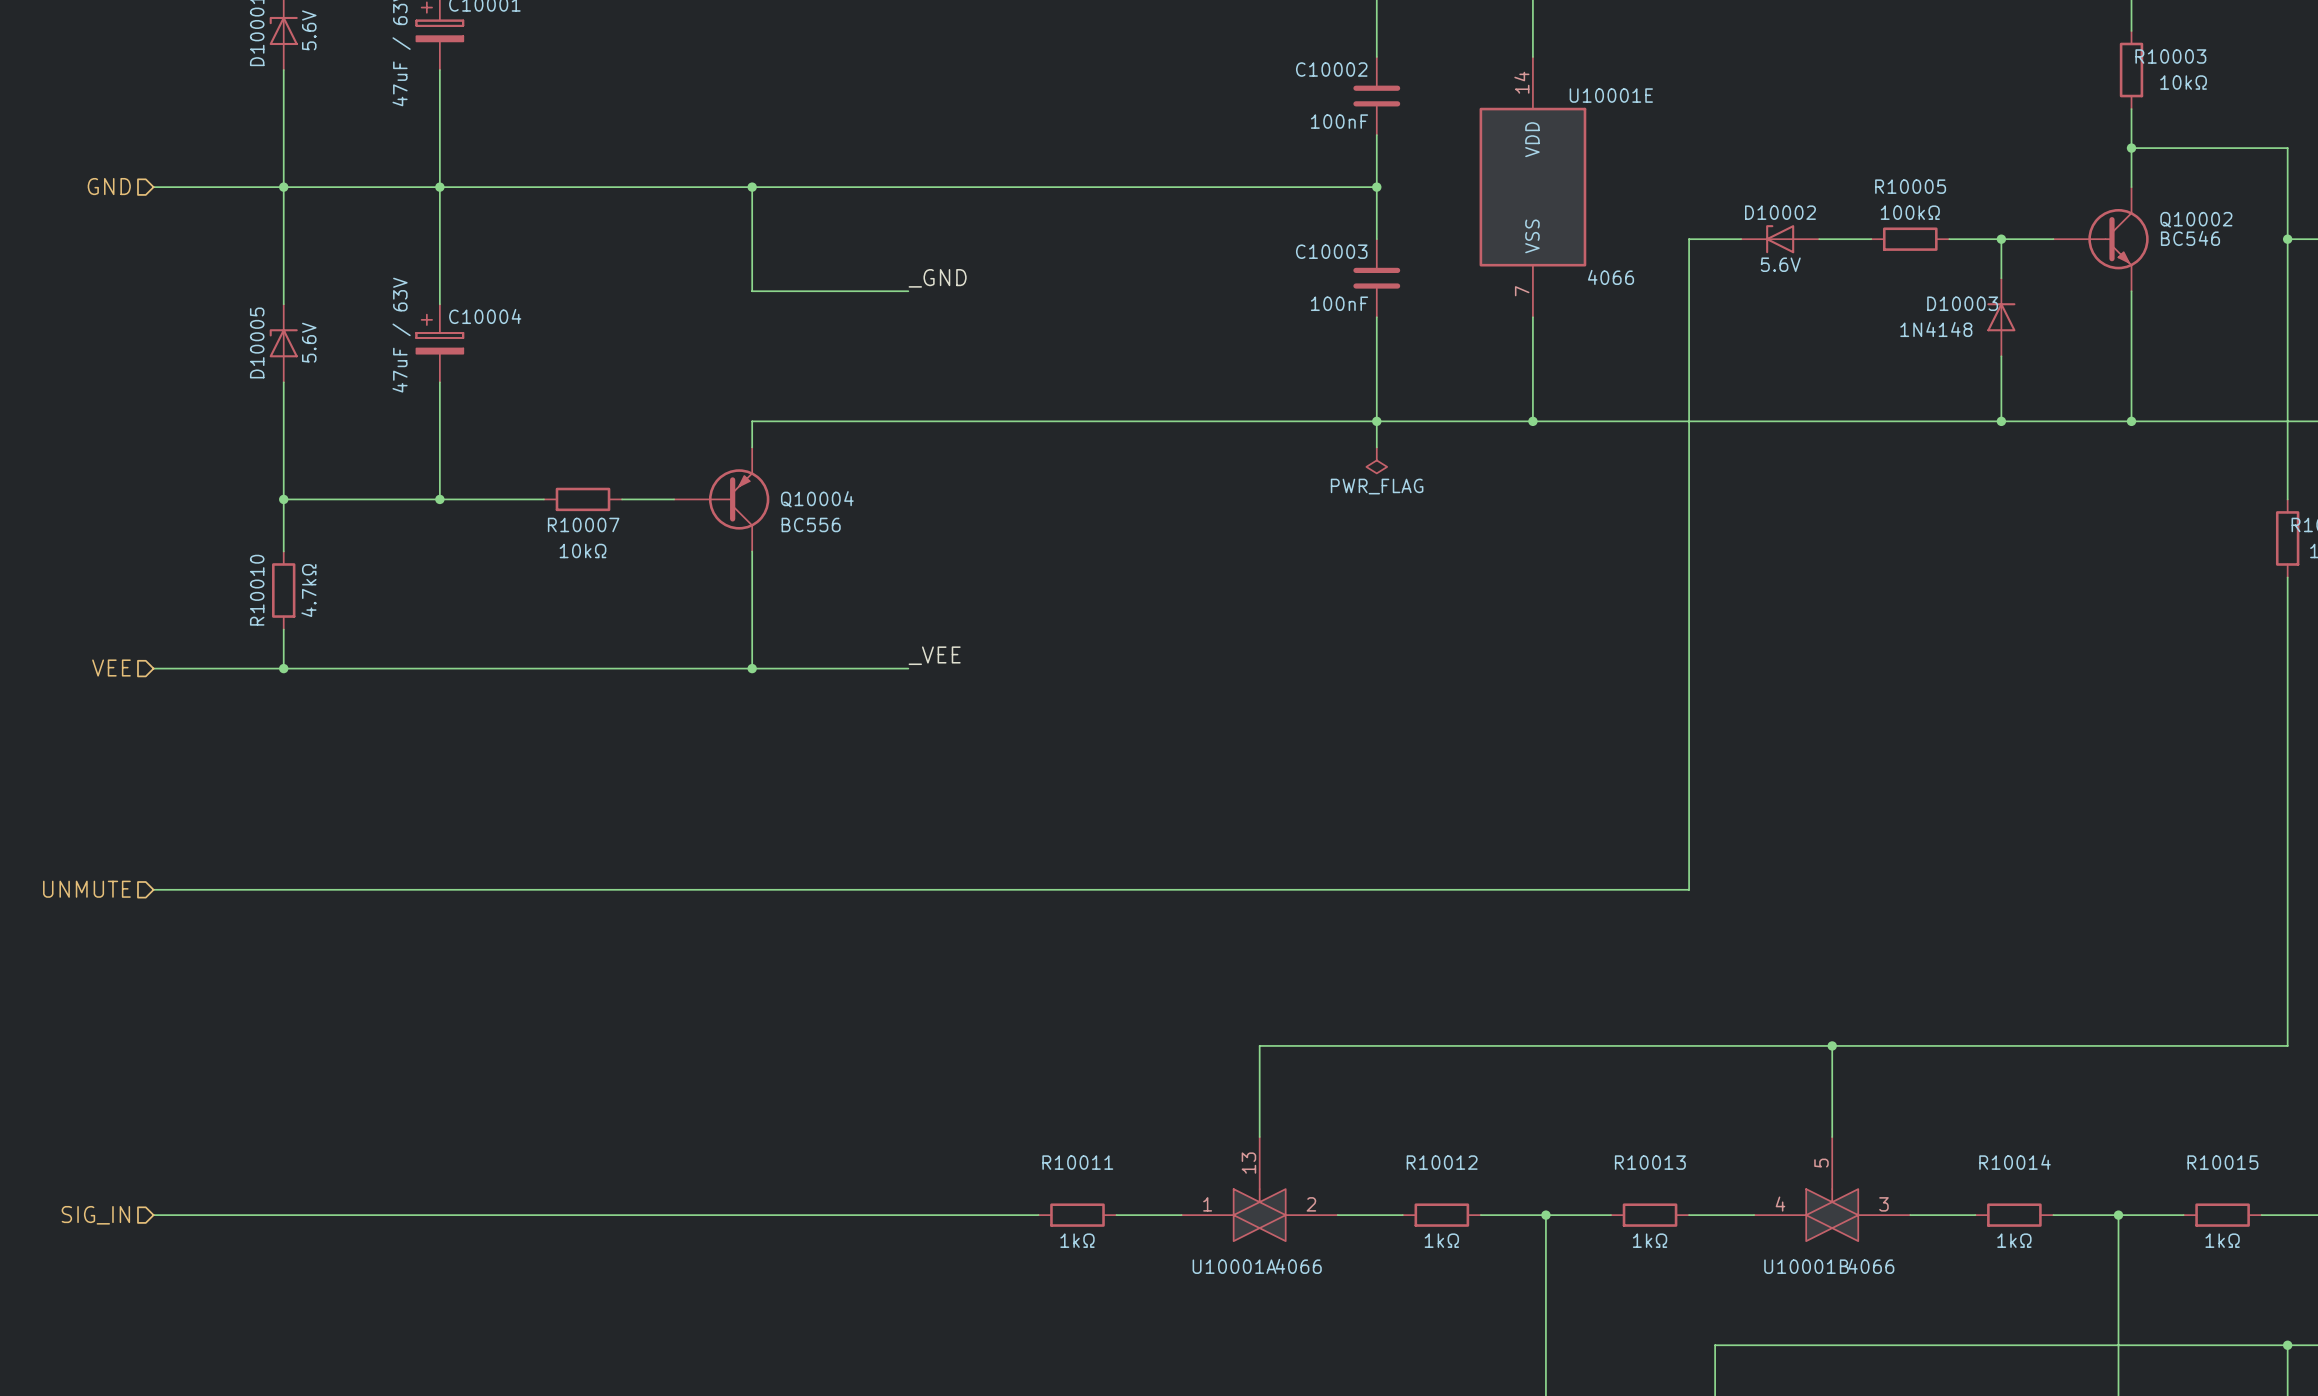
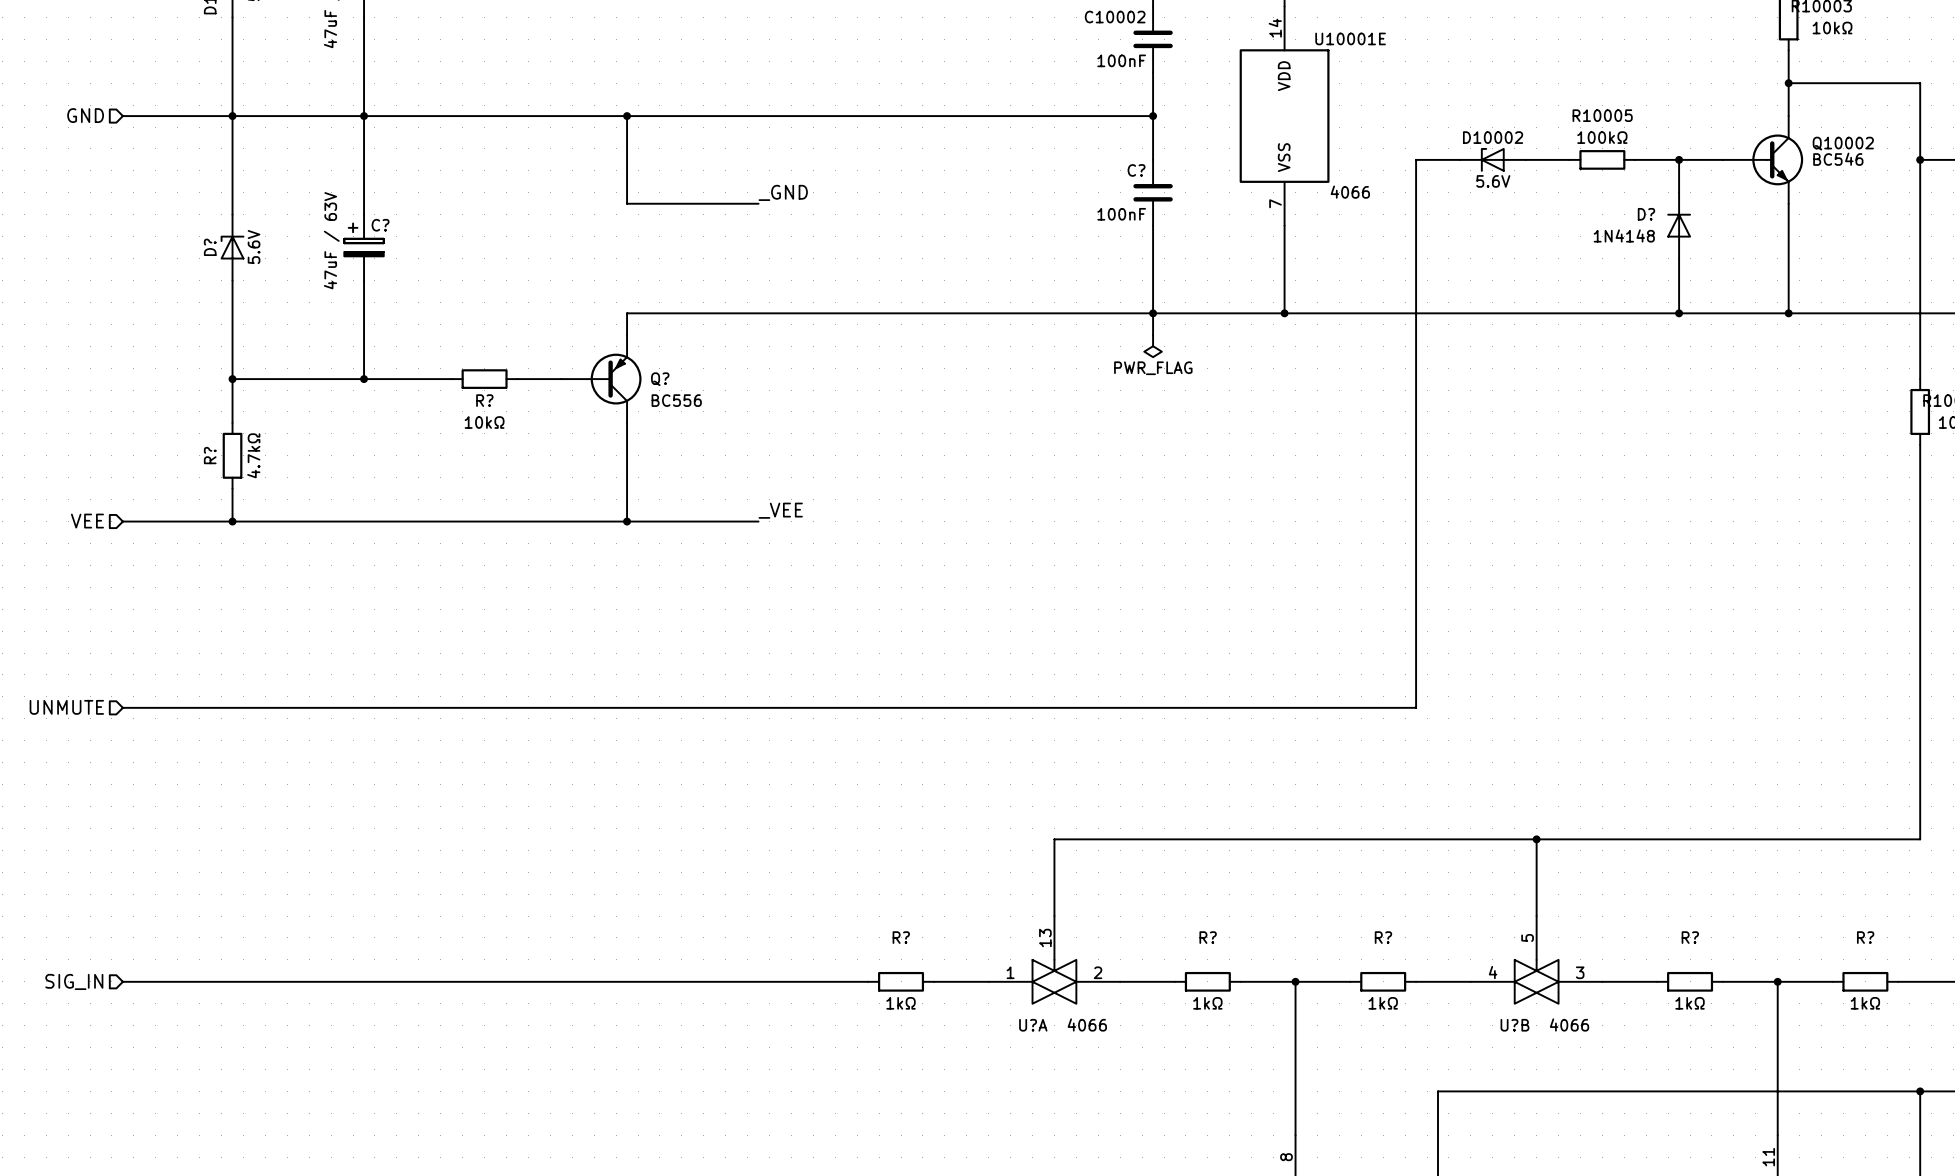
C10003 name: C10003 (1331, 251) -> C? (1136, 170)
D10003 name: D10003 (1962, 303) -> D? (1646, 214)
C10004 name: C10004 (485, 316) -> C? (380, 225)
D10005 name: D10005 (257, 342) -> D? (210, 247)
Q10004 name: Q10004 (817, 499) -> Q? (660, 379)
R10007 name: R10007 (583, 524) -> R? (484, 400)
R10010 name: R10010 (257, 590) -> R? (210, 455)
R10011 name: R10011 (1077, 1162) -> R? (901, 937)
R10012 name: R10012 (1442, 1162) -> R? (1208, 937)
R10013 name: R10013 (1650, 1162) -> R? (1383, 937)
R10014 name: R10014 (2015, 1162) -> R? (1690, 937)
R10015 name: R10015 (2222, 1162) -> R? (1865, 937)
U10001A name: U10001A (1234, 1266) -> U?A (1033, 1025)
U10001B name: U10001B (1806, 1266) -> U?B (1514, 1025)

